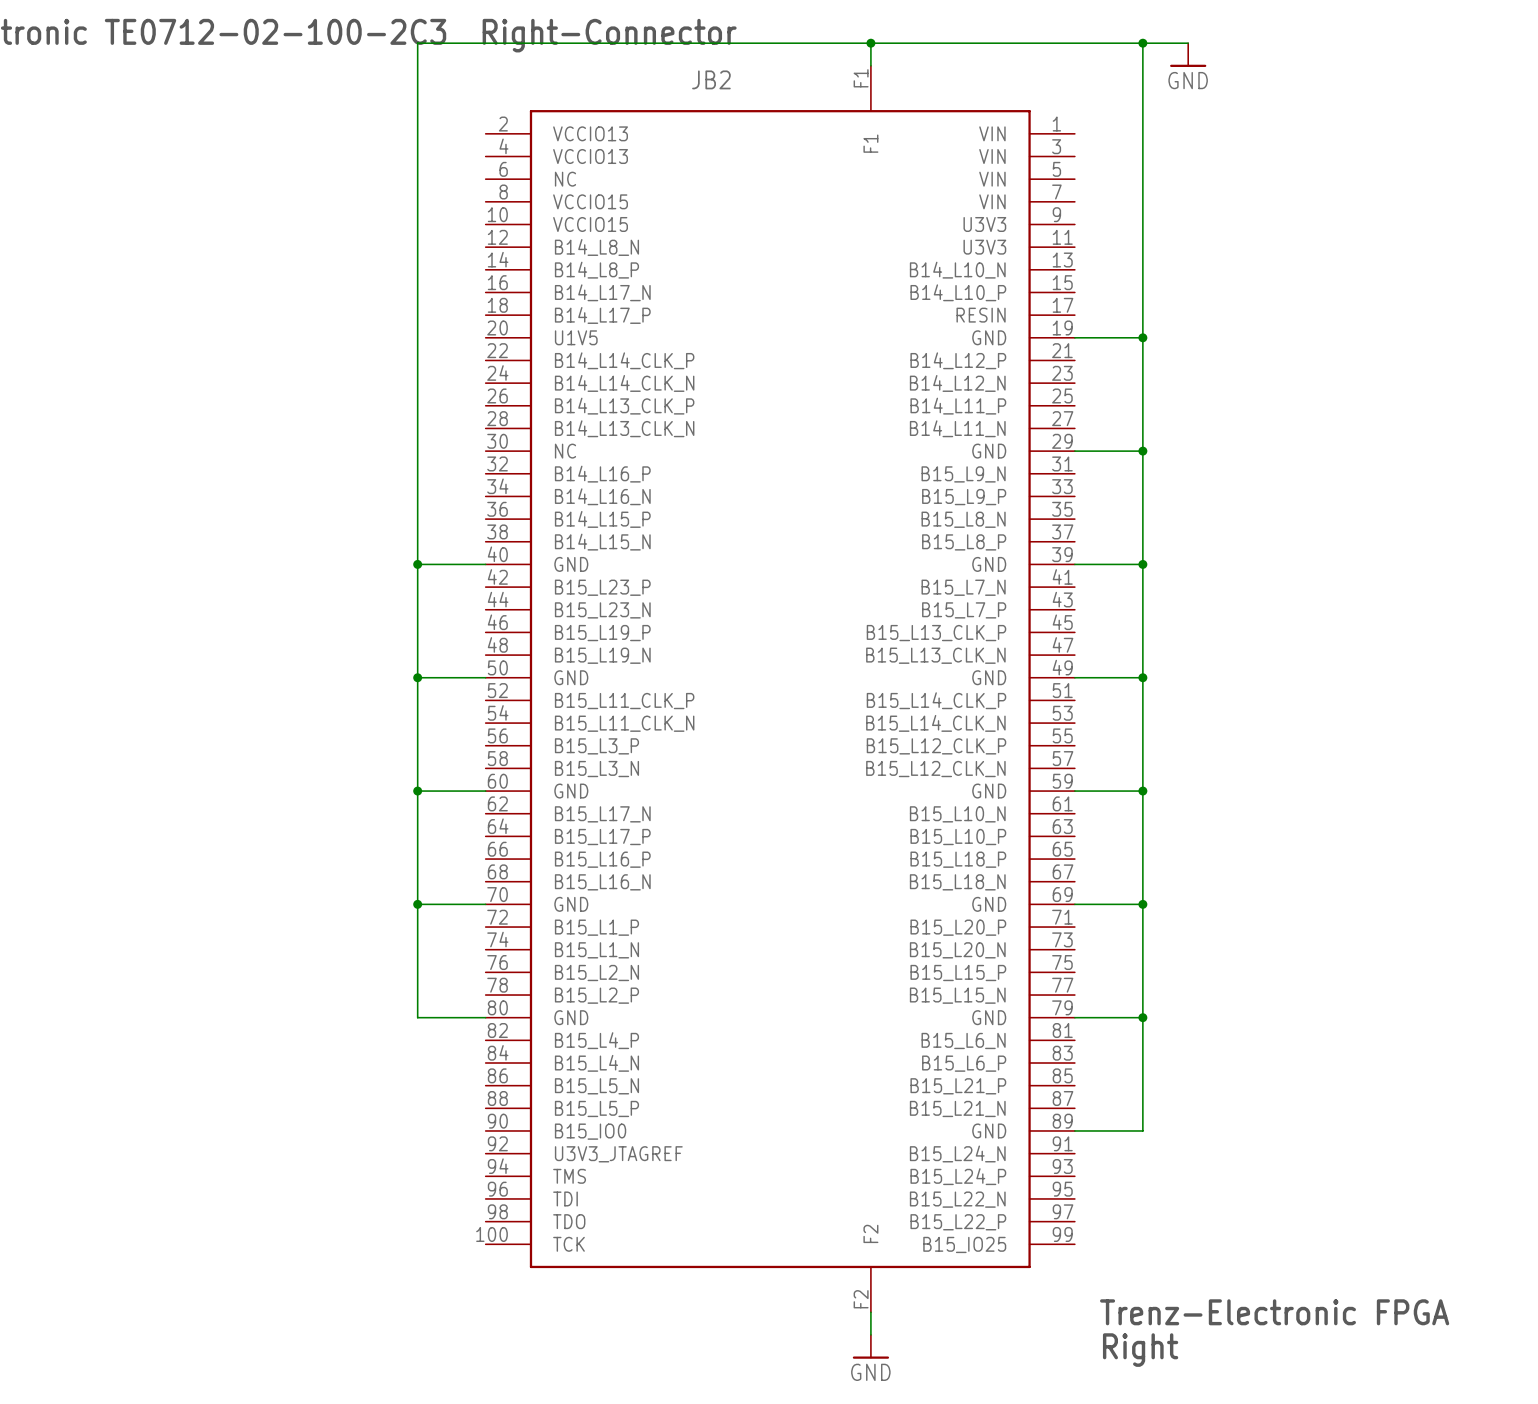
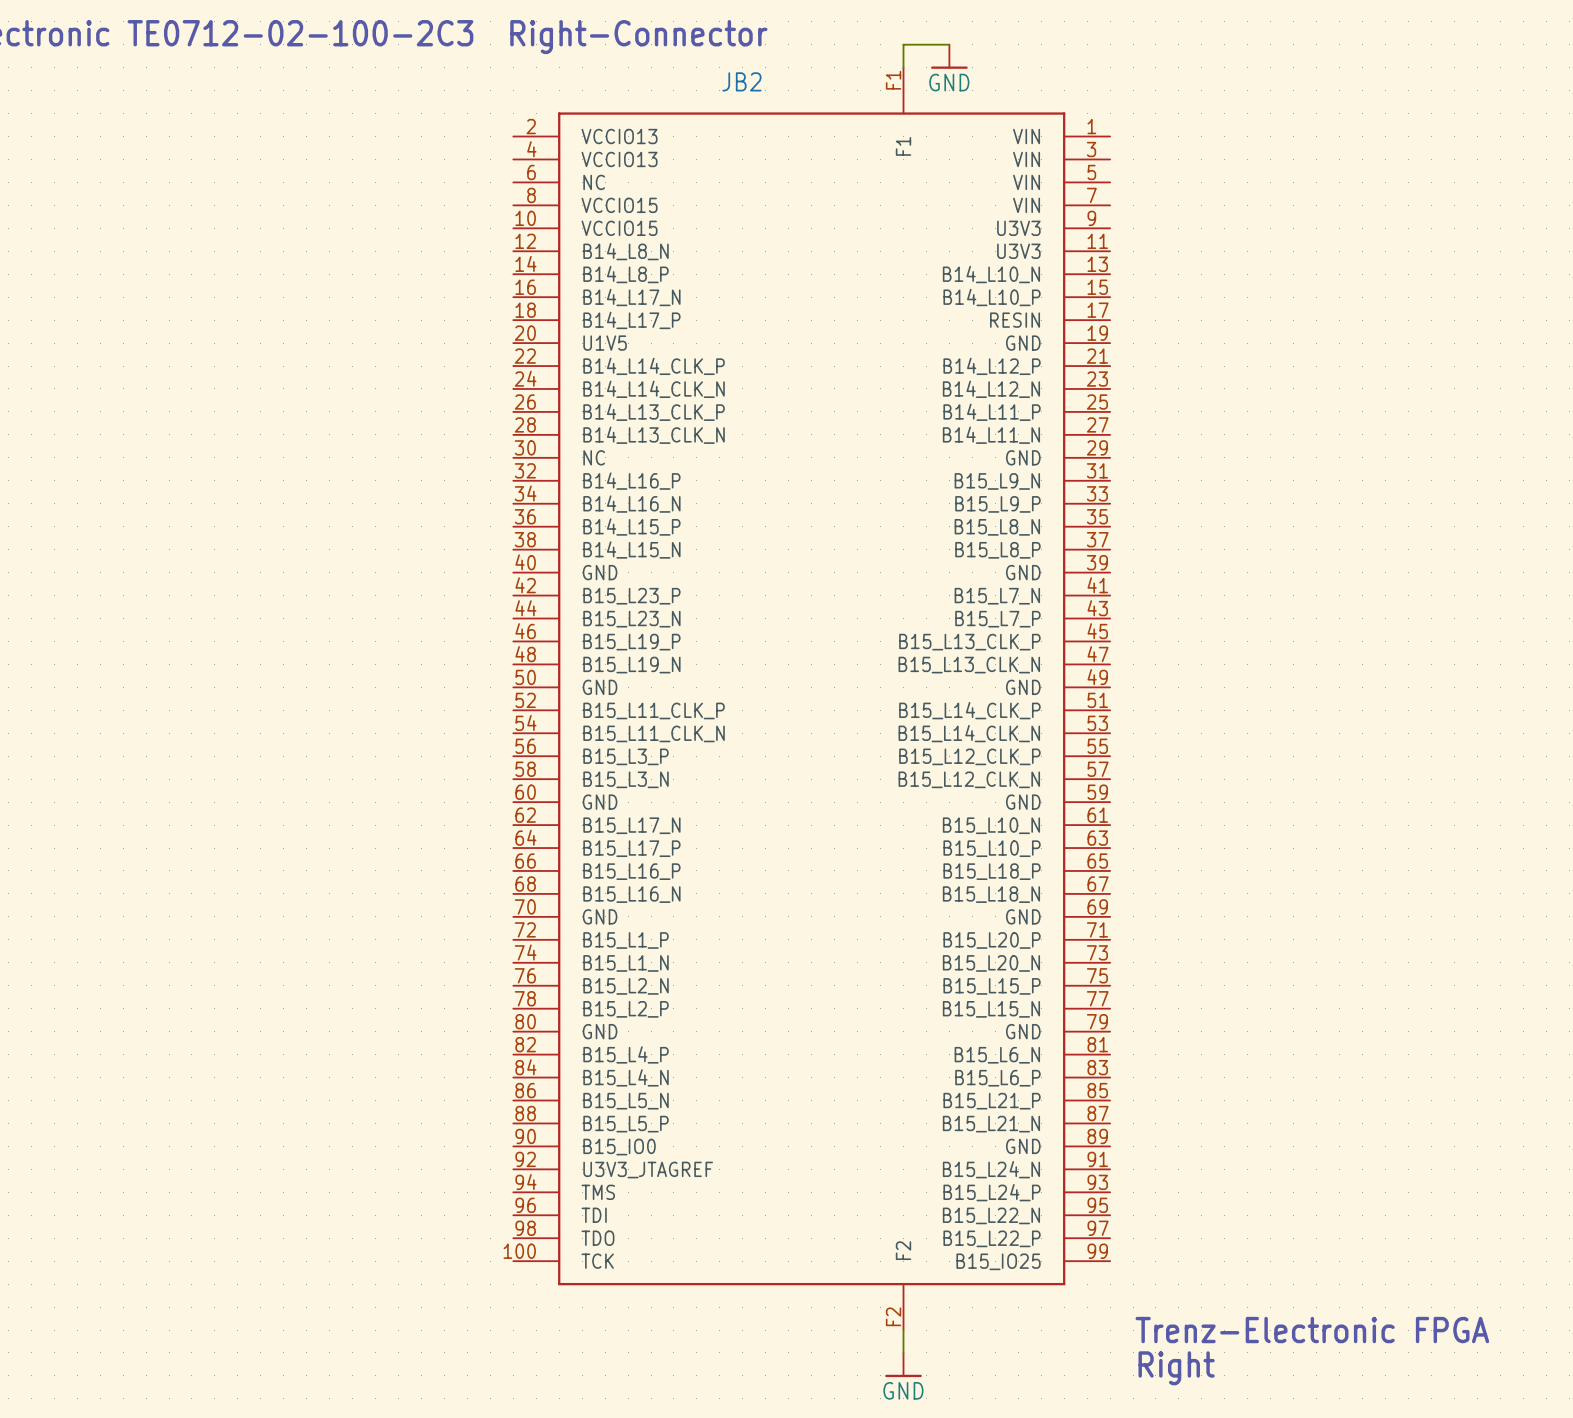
wire: (870, 43) (417, 43) (417, 1017) (485, 1017) -> none
junction: (870, 43) -> none
wire: (916, 43) (1188, 43) -> none
wire: (1142, 43) (1142, 1130) (1074, 1130) -> none
junction: (1142, 43) -> none
power symbol: none -> GND (949, 56)
power symbol: GND (1188, 55) -> none
wire: (1074, 337) (1142, 337) -> none
junction: (1142, 337) -> none
wire: (1074, 451) (1142, 451) -> none
junction: (1142, 451) -> none
wire: (417, 564) (485, 564) -> none
junction: (417, 564) -> none
wire: (1074, 564) (1142, 564) -> none
junction: (1142, 564) -> none
wire: (417, 677) (485, 677) -> none
junction: (417, 677) -> none
wire: (1074, 677) (1142, 677) -> none
junction: (1142, 677) -> none
wire: (417, 791) (485, 791) -> none
junction: (417, 791) -> none
wire: (1074, 791) (1142, 791) -> none
junction: (1142, 791) -> none
wire: (417, 904) (485, 904) -> none
junction: (417, 904) -> none
wire: (1074, 904) (1142, 904) -> none
junction: (1142, 904) -> none
wire: (1074, 1017) (1142, 1017) -> none
junction: (1142, 1017) -> none

